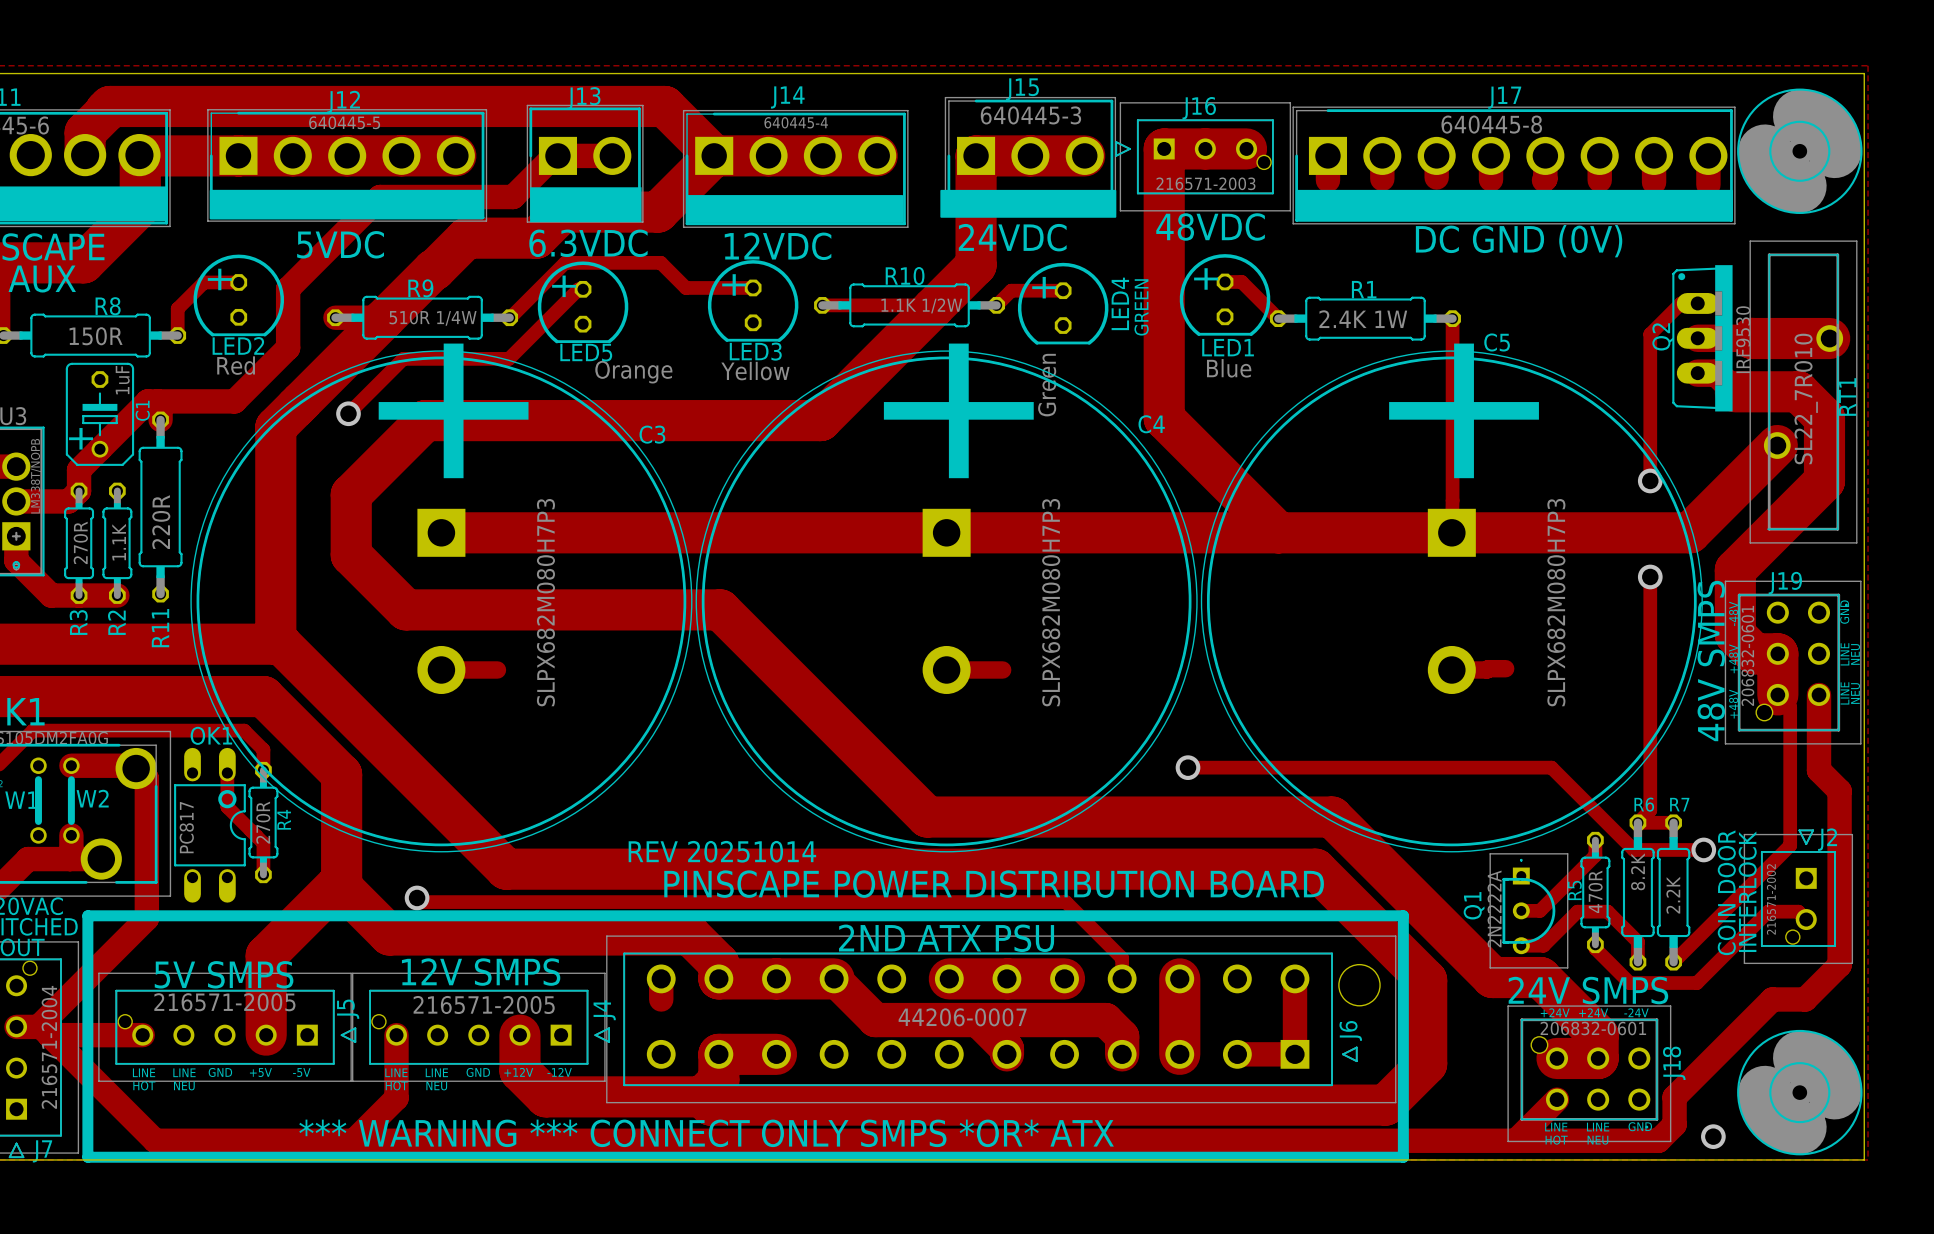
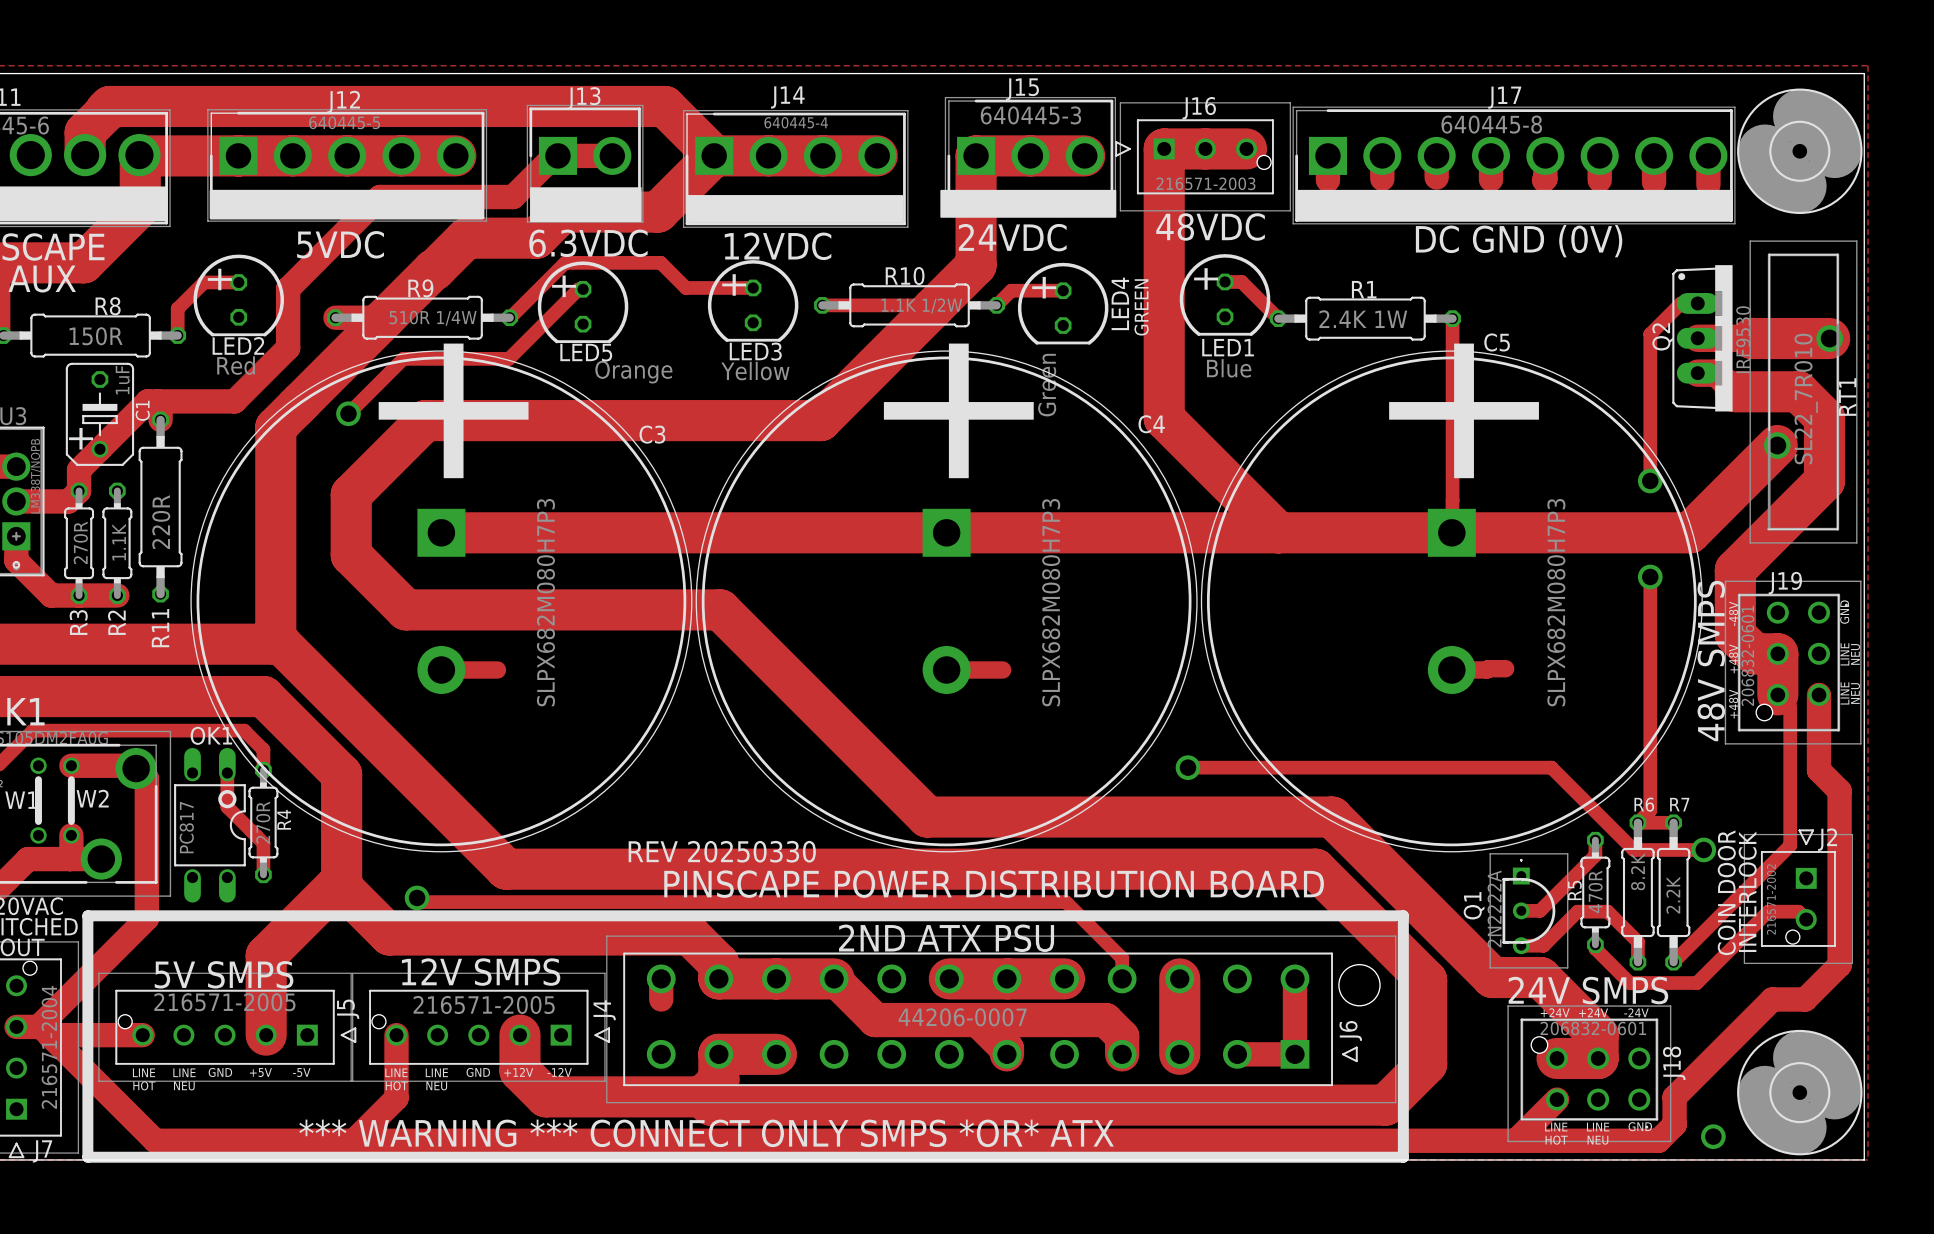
text: REV 20251014 (722, 851) -> REV 20250330 (722, 851)

